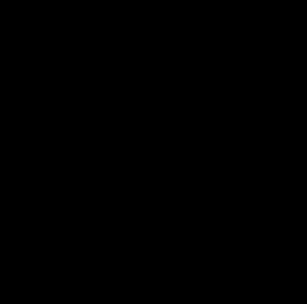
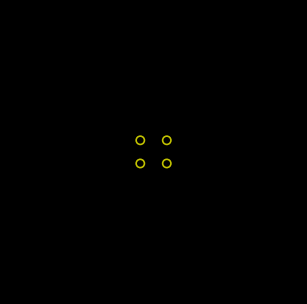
part: none -> (153, 151)

